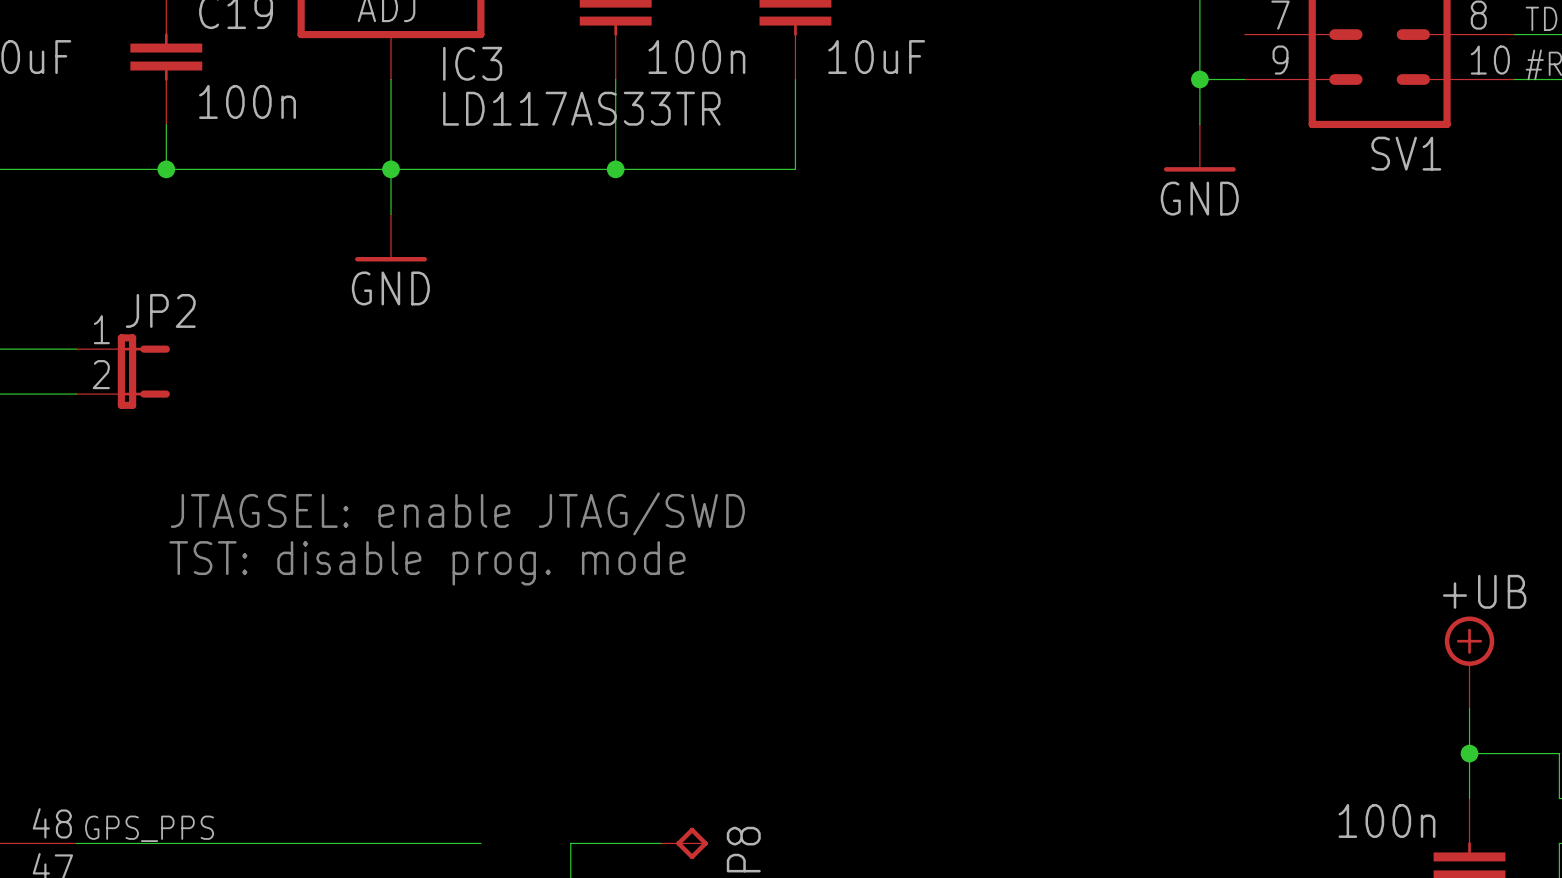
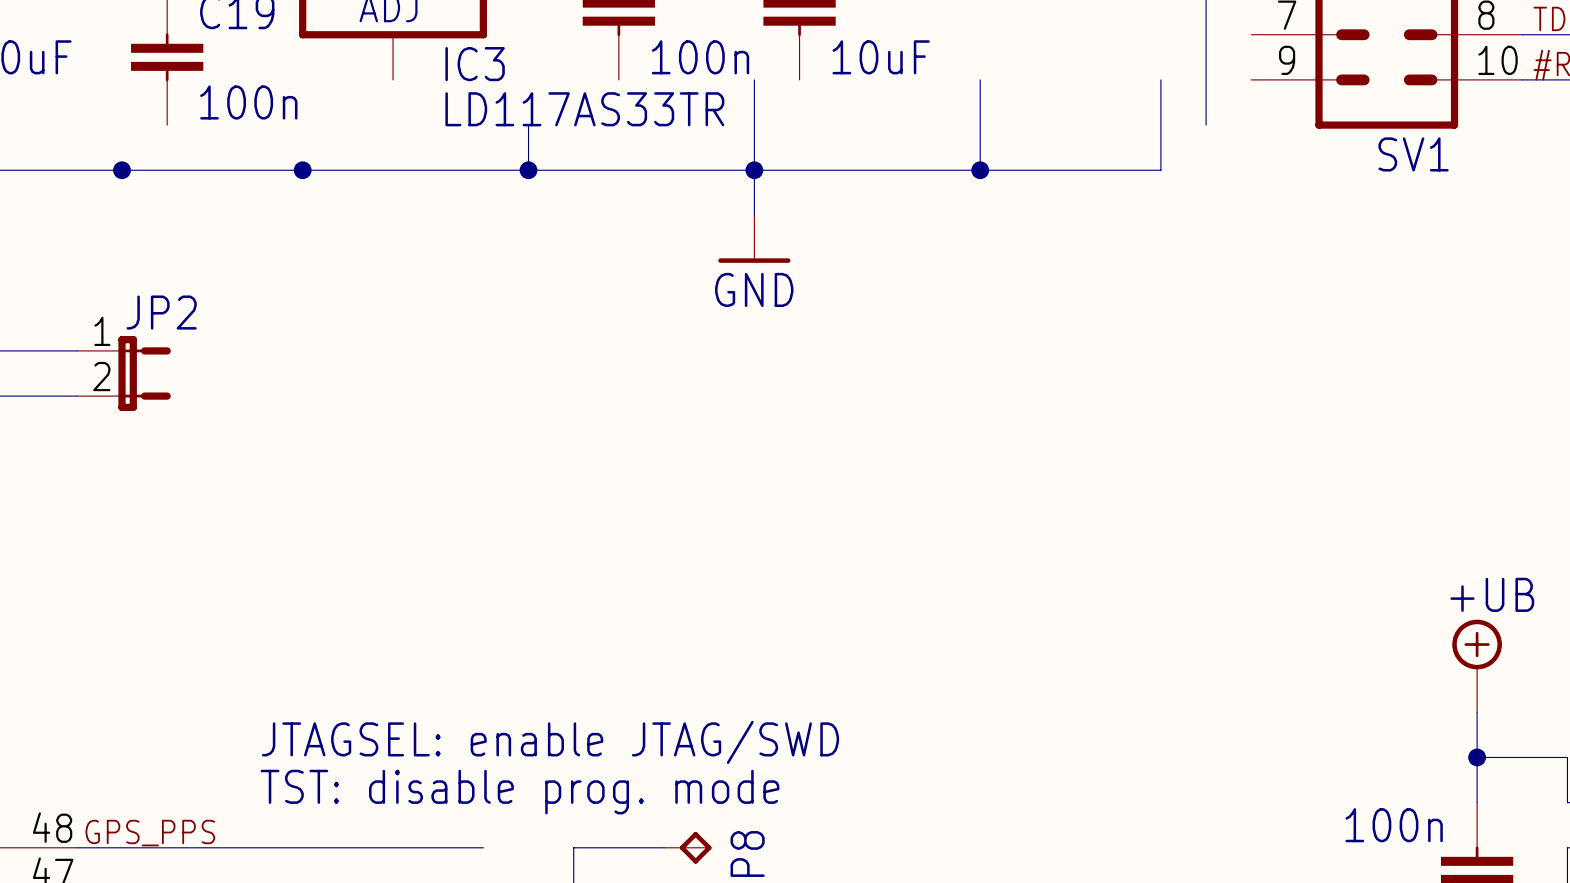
wire: (391, 79) (391, 214) -> (754, 79) (754, 215)
wire: (615, 79) (615, 169) -> (980, 79) (980, 170)
wire: (795, 79) (795, 169) -> (1160, 79) (1160, 170) (799, 170)
wire: (1199, 79) (1244, 79) -> none
junction: (1199, 79) -> none
wire: (166, 124) (166, 169) -> (528, 125) (528, 170)
power symbol: GND (1199, 148) -> none
junction position: (166, 169) -> (122, 170)
junction: none -> (302, 170)
junction: (391, 169) -> none
junction: none -> (528, 170)
junction: (615, 169) -> none
junction: none -> (754, 170)
junction: none -> (980, 170)
power symbol: GND (391, 237) -> none
power symbol: none -> GND (754, 239)
text position: JTAGSEL: enable JTAG/SWD (457, 513) -> JTAGSEL: enable JTAG/SWD (550, 742)
text position: TST: disable prog. mode (427, 563) -> TST: disable prog. mode (520, 792)

